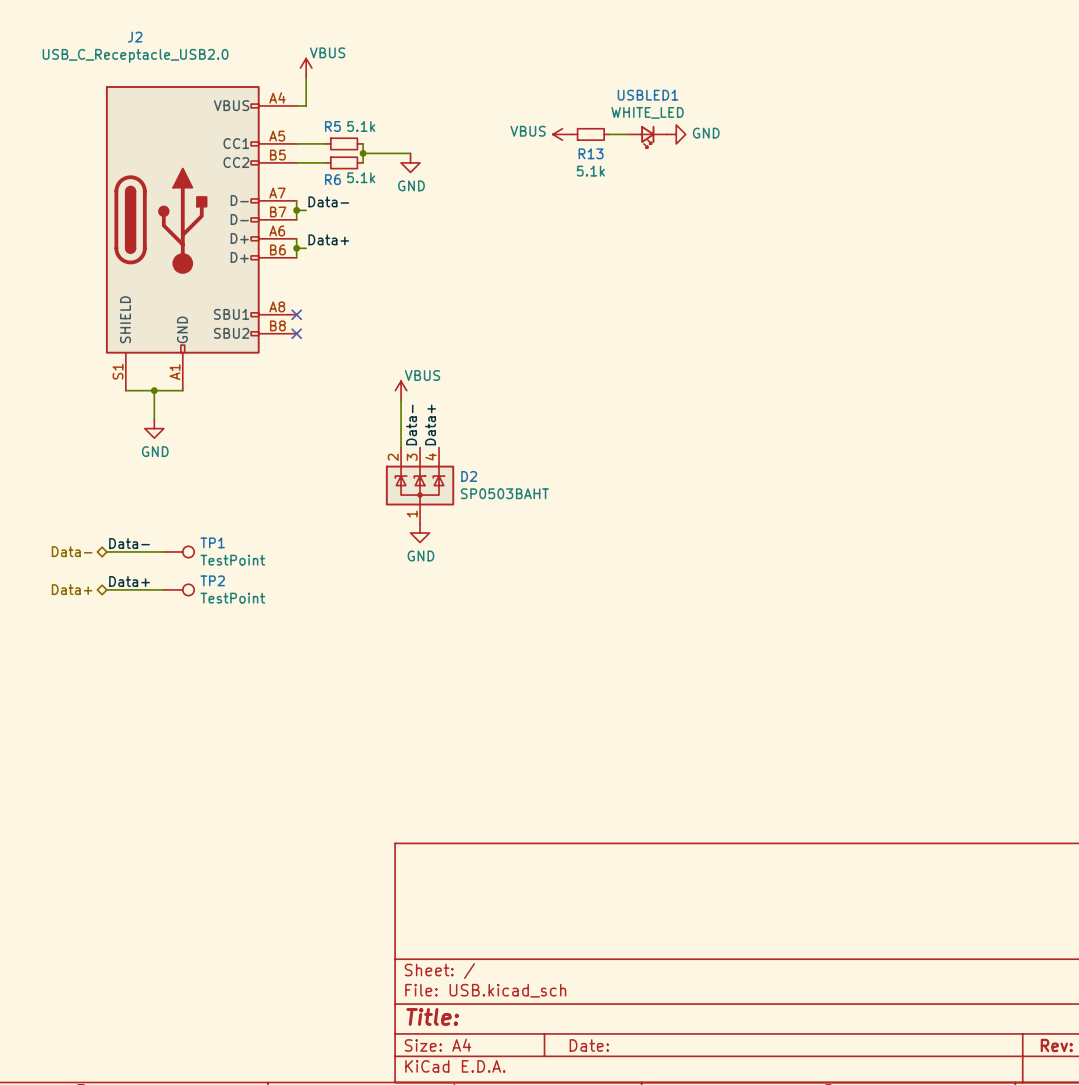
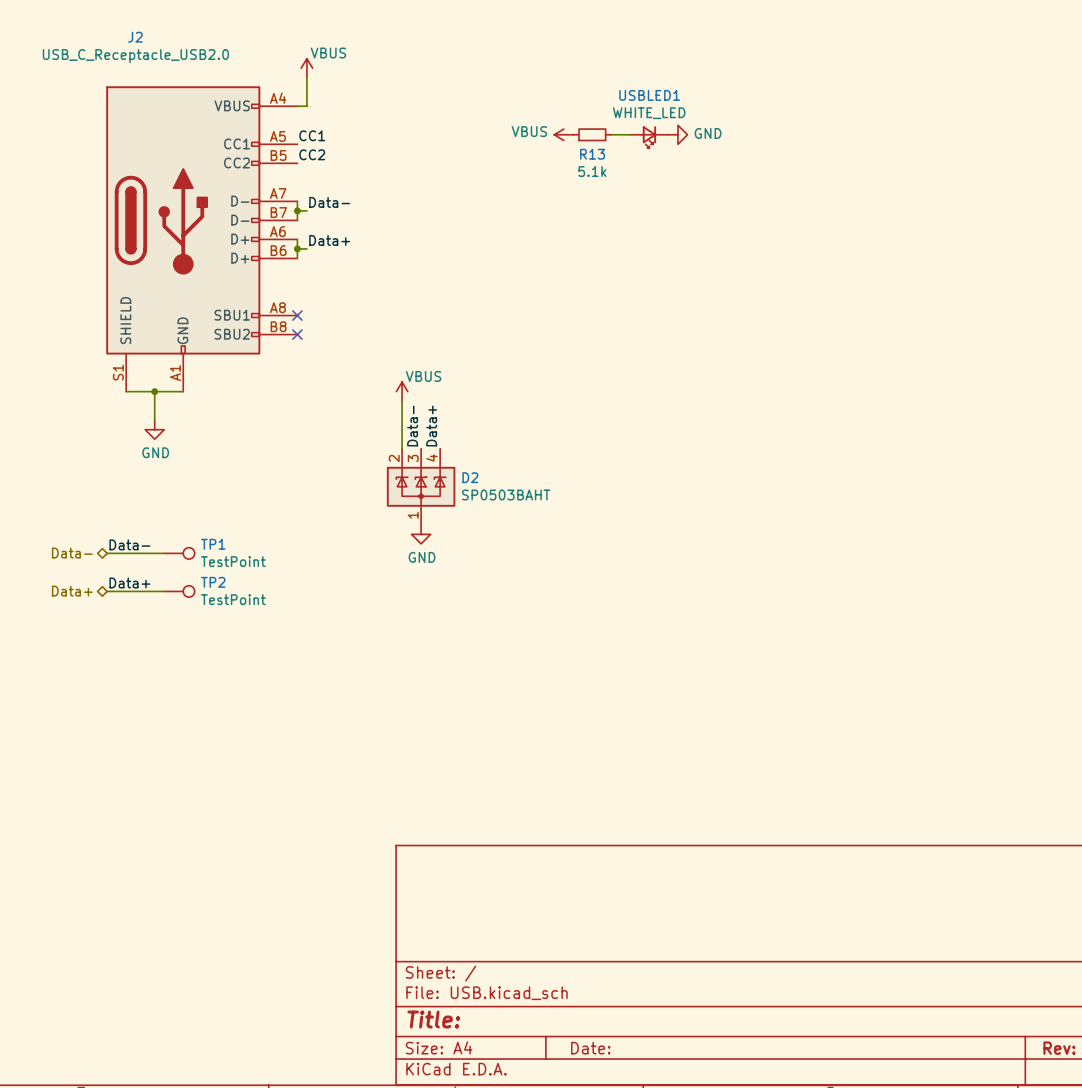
label: none -> CC1 (312, 135)
wire: (296, 143) (325, 143) -> none
R5: 5.1k (344, 143) -> none
wire: (363, 143) (363, 162) -> none
wire: (363, 153) (410, 153) -> none
junction: (363, 153) -> none
label: none -> CC2 (312, 154)
wire: (296, 162) (325, 162) -> none
R6: 5.1k (344, 162) -> none
power symbol: GND (410, 162) -> none

